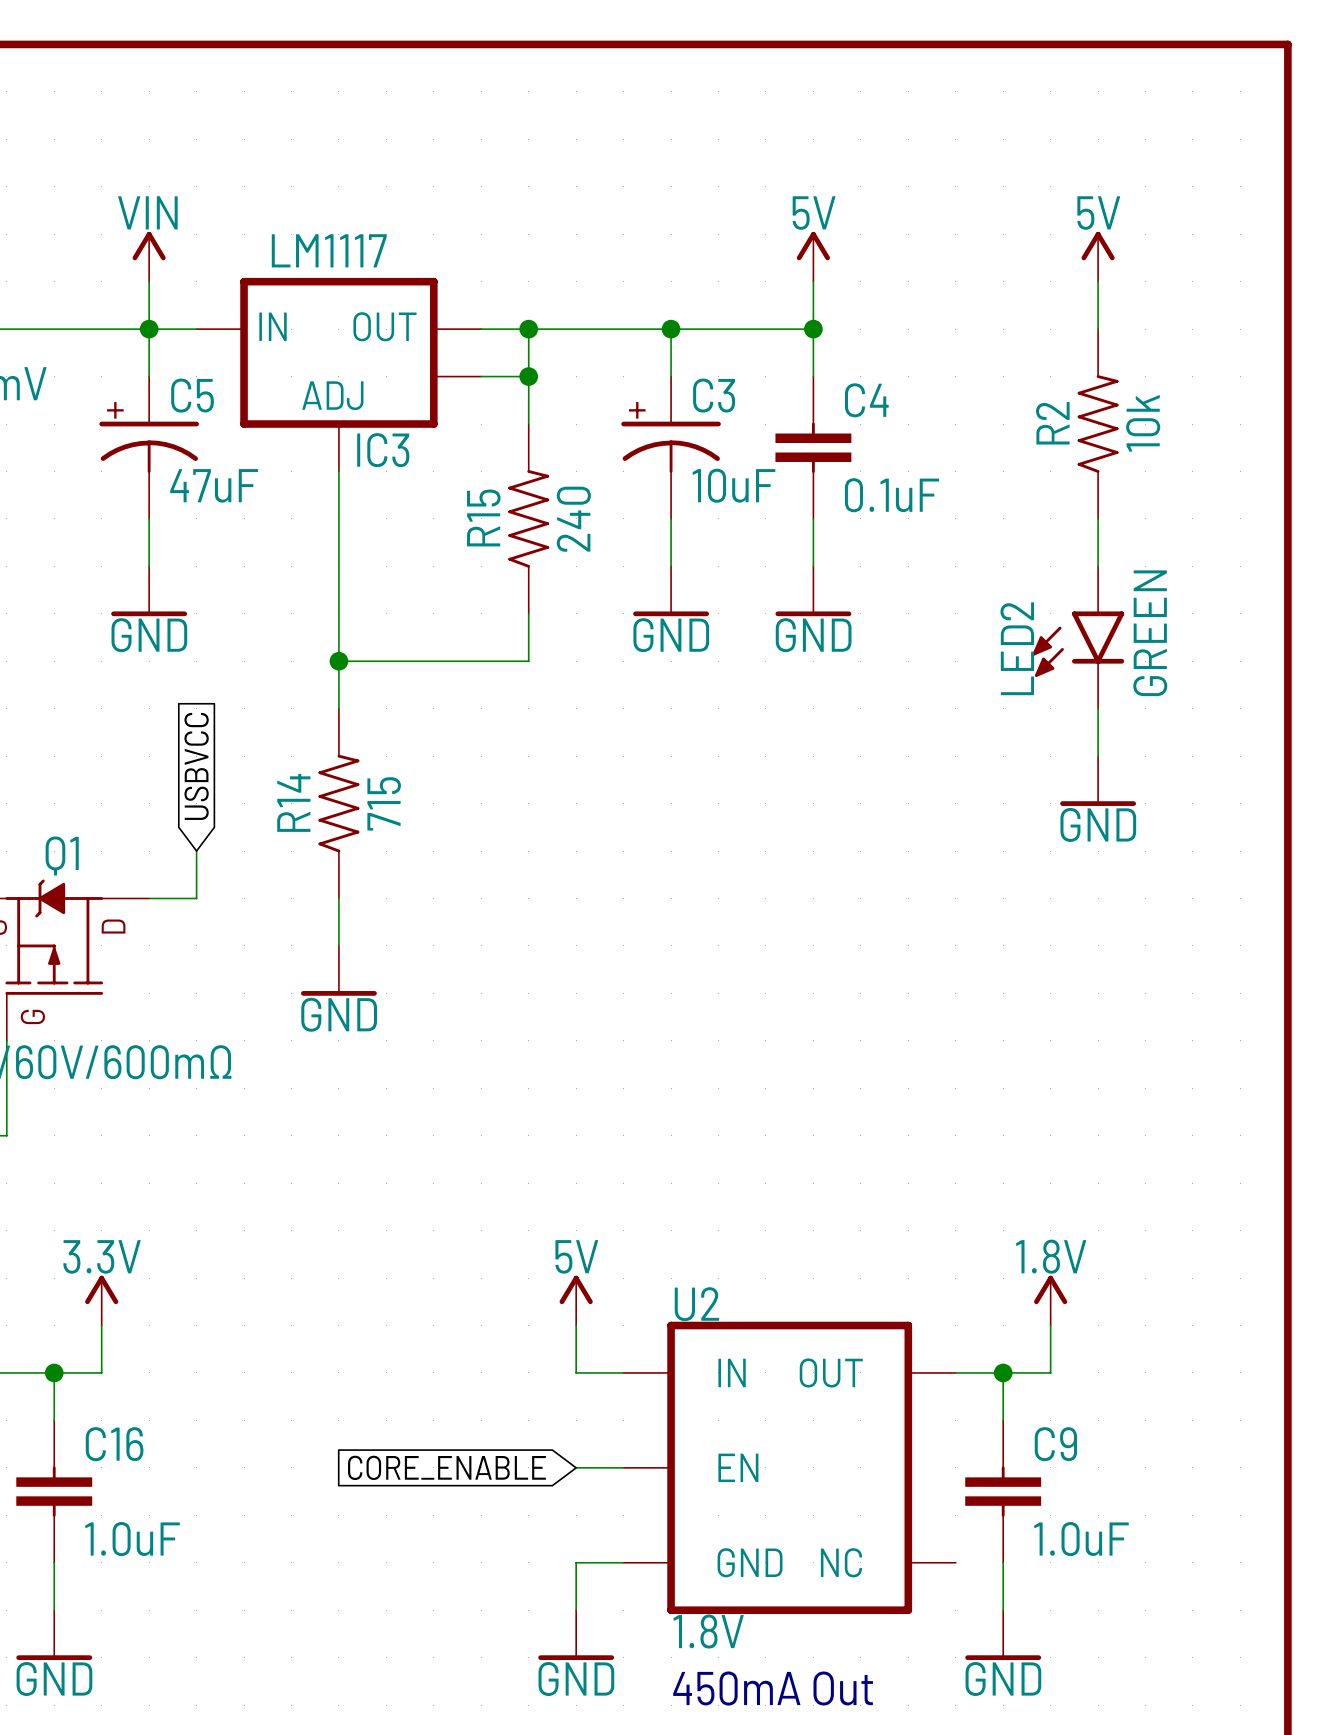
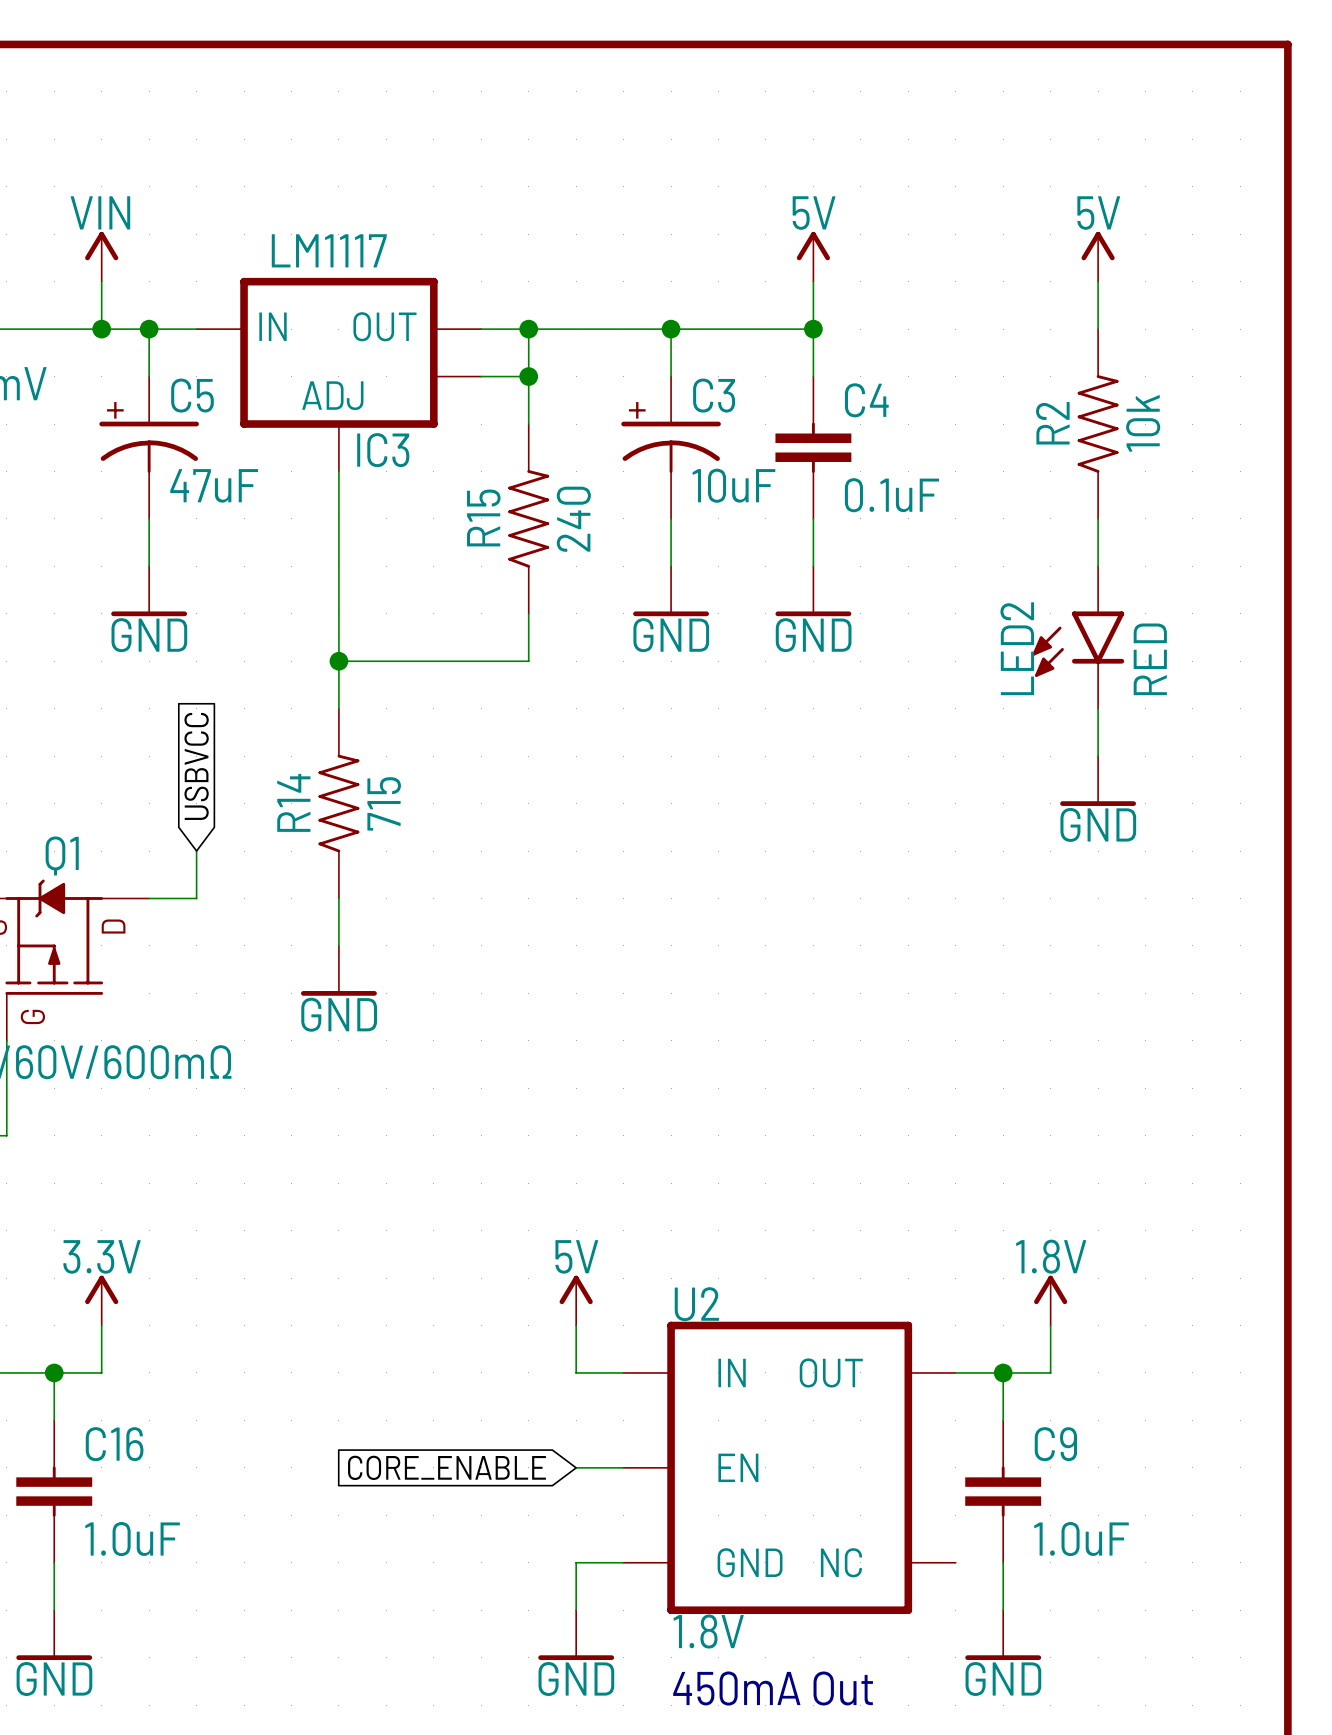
power symbol position: VIN (149, 256) -> VIN (101, 256)
wire: (149, 281) (149, 329) -> (101, 281) (101, 329)
junction: none -> (101, 329)
LED2 value: GREEN (1150, 633) -> RED (1150, 659)

